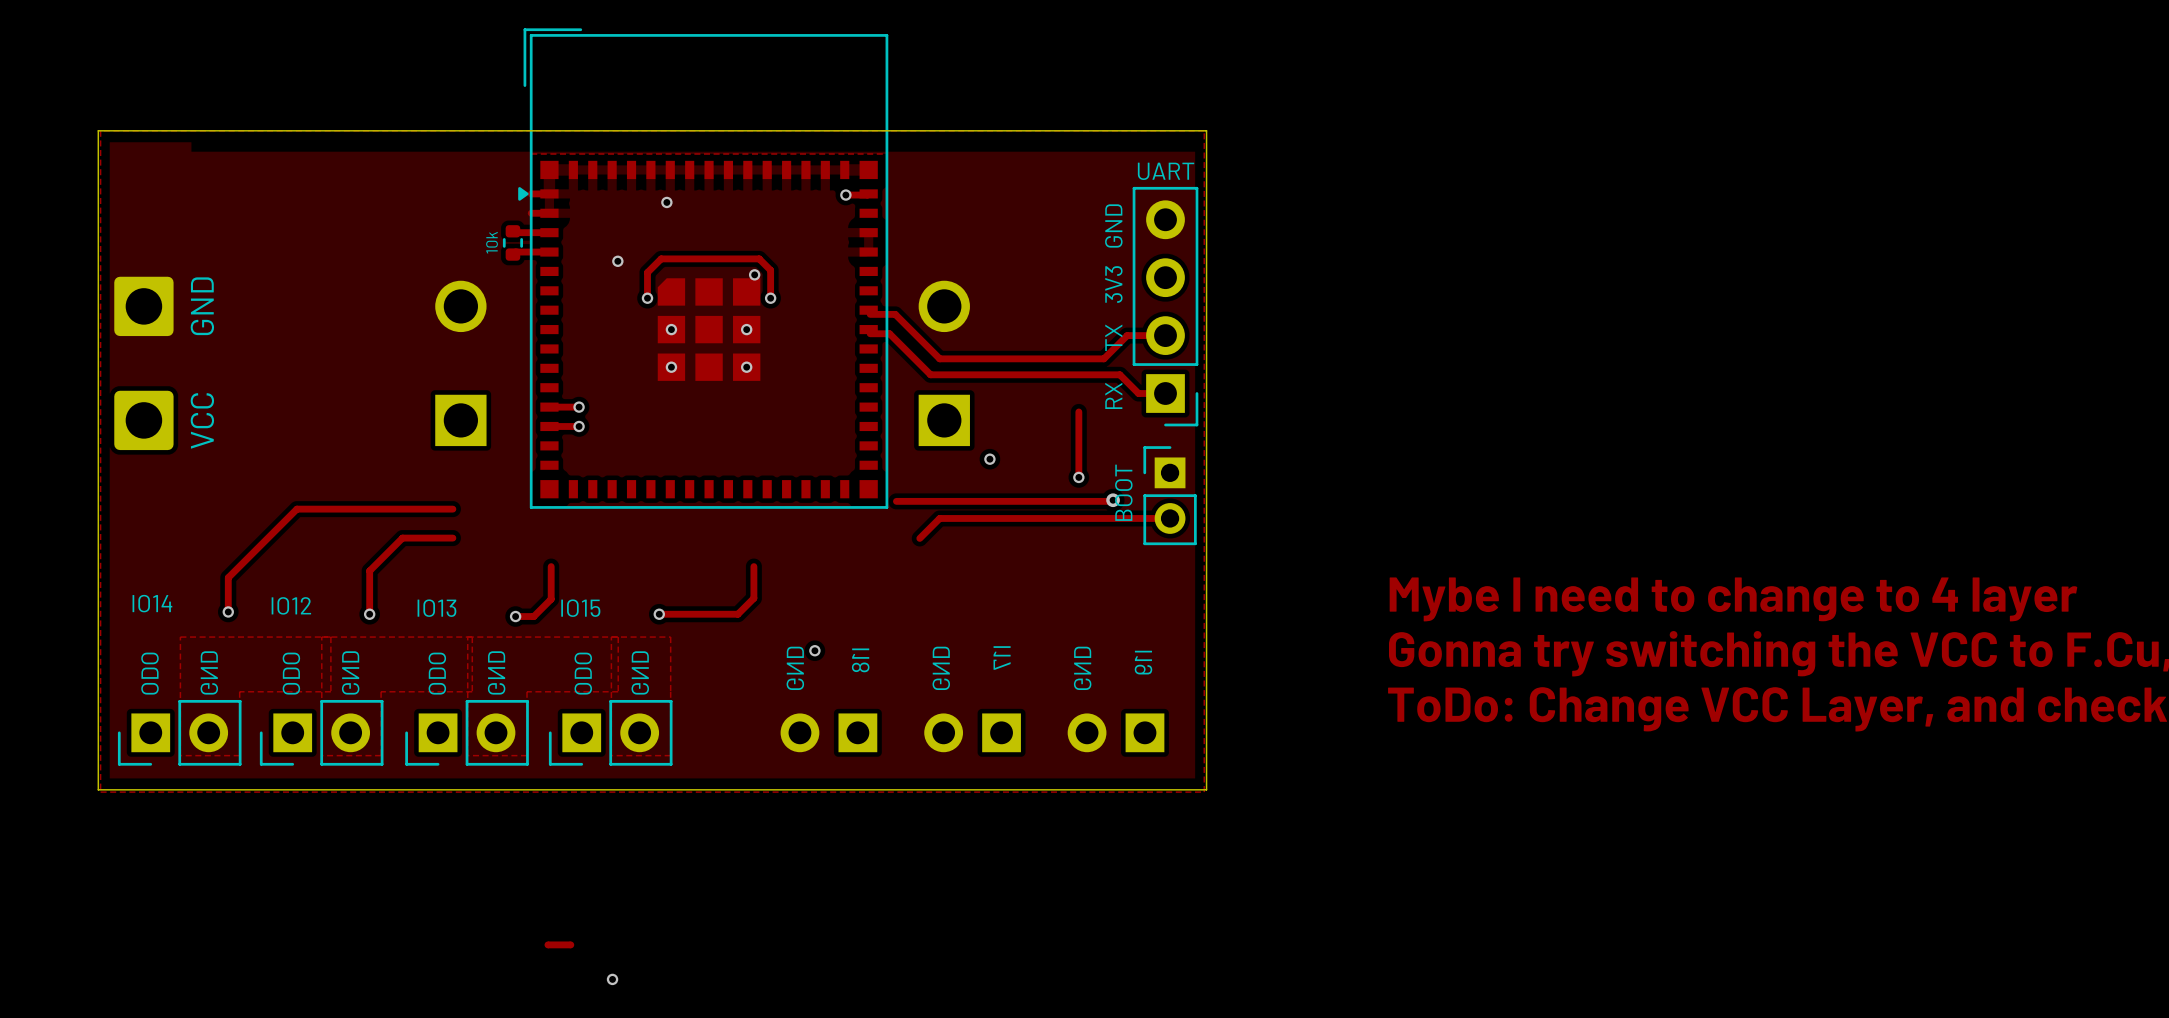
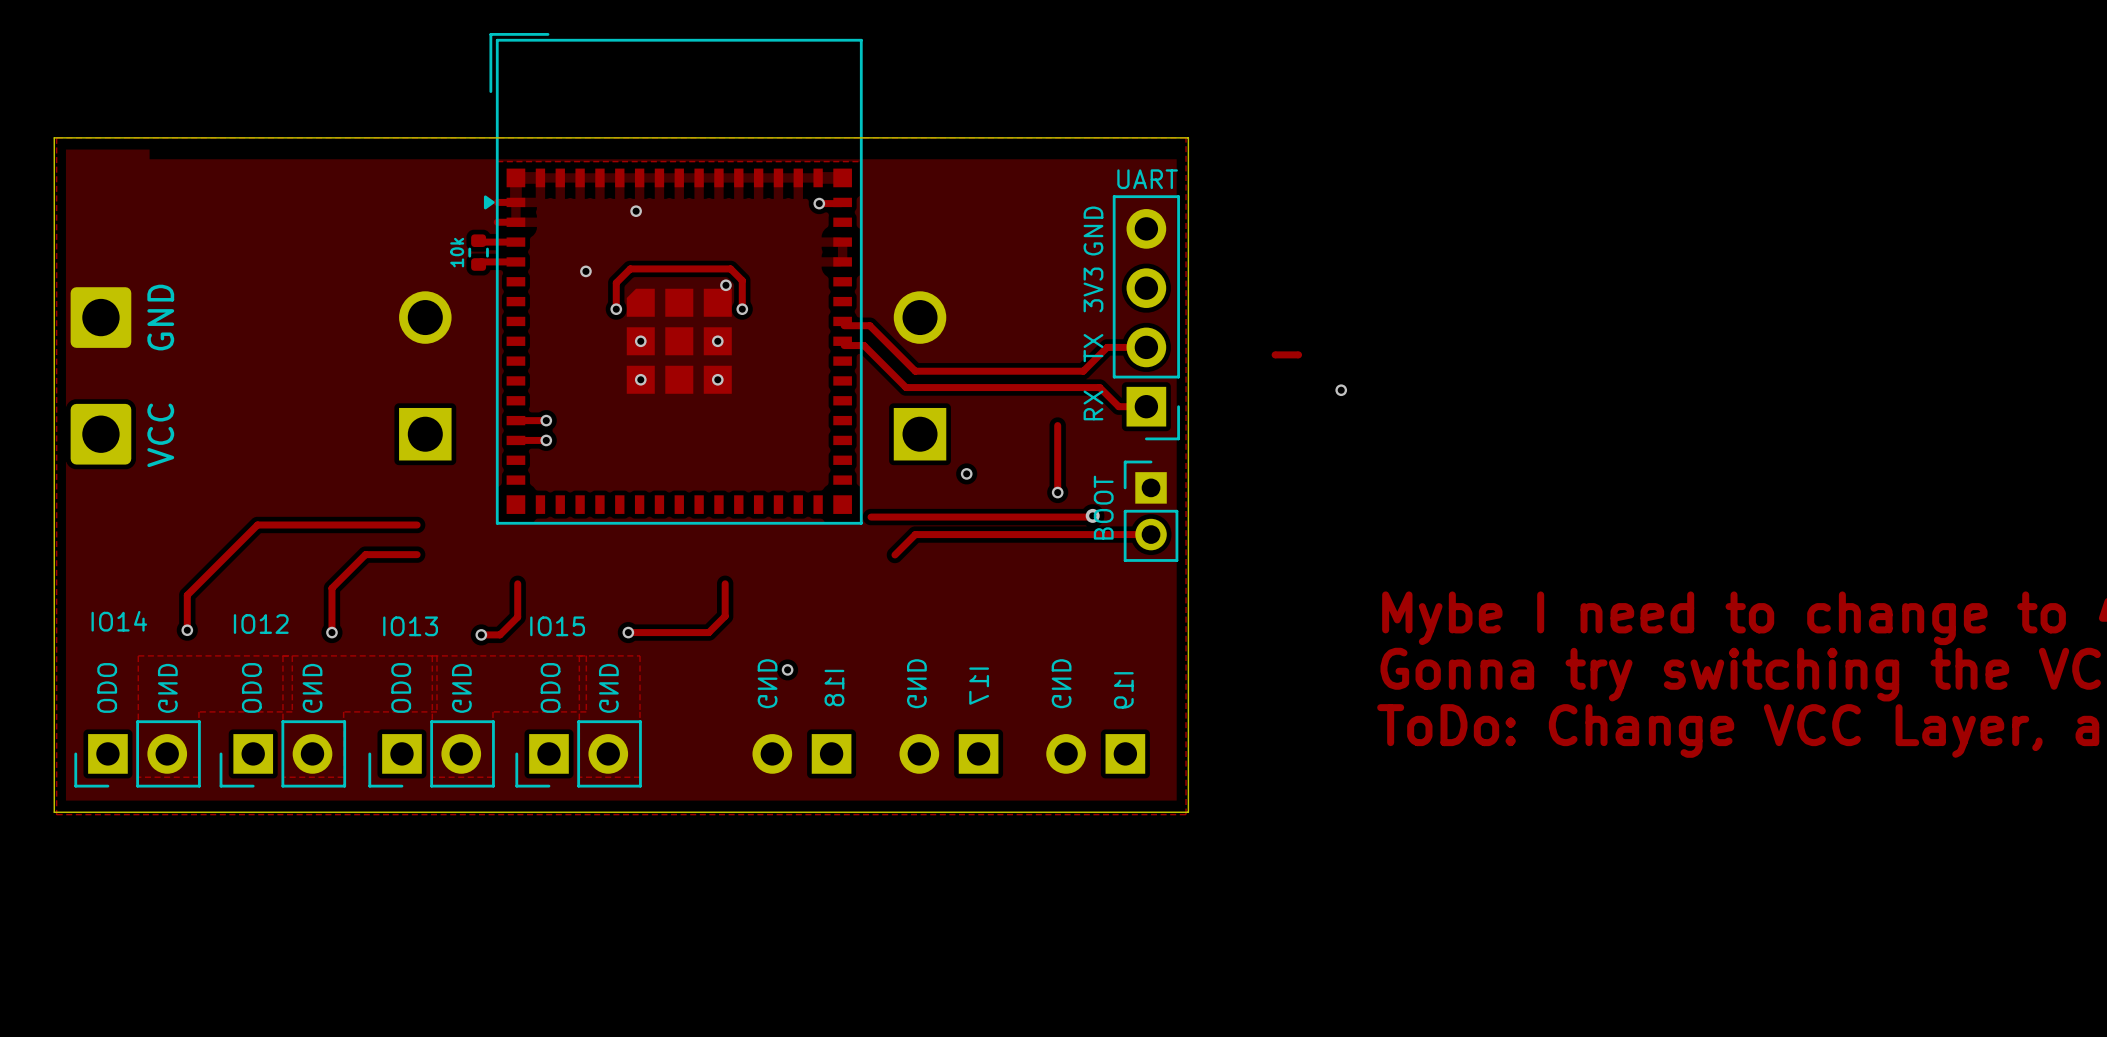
part: none -> (1286, 354)
via: none -> (1341, 390)
part: (559, 944) -> none
via: (612, 979) -> none

